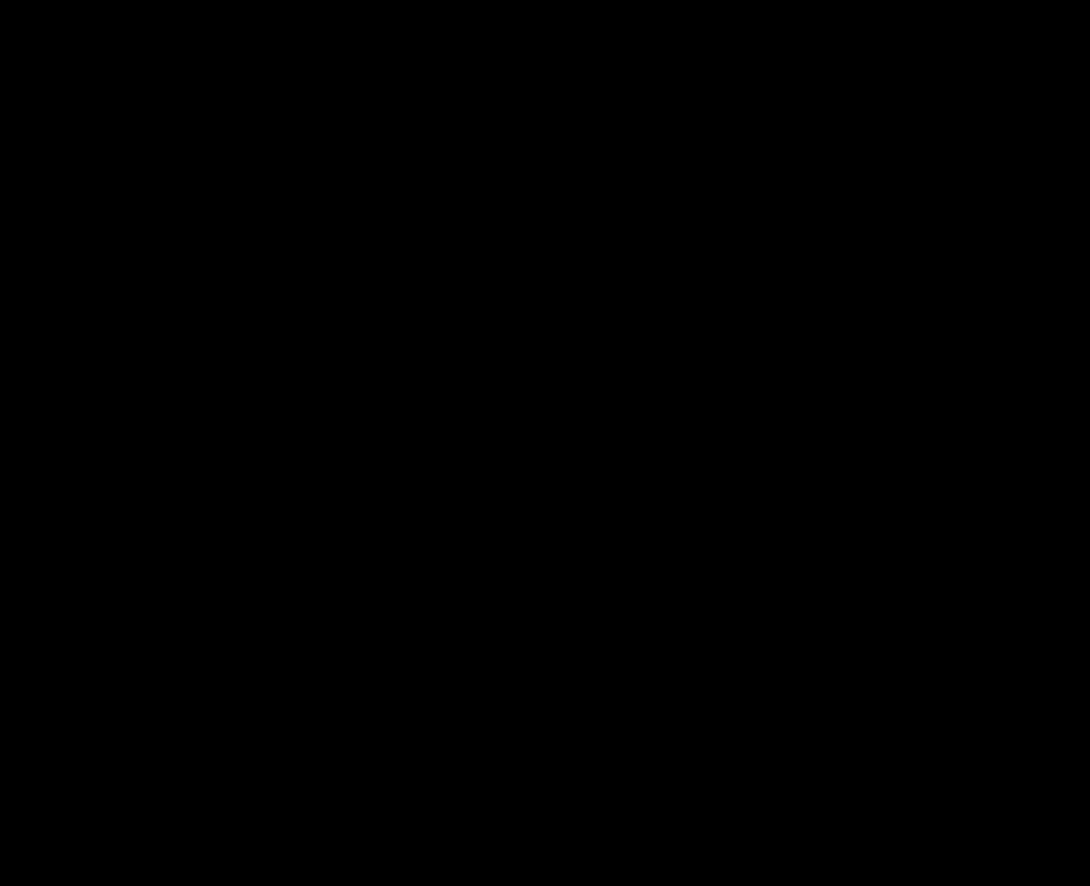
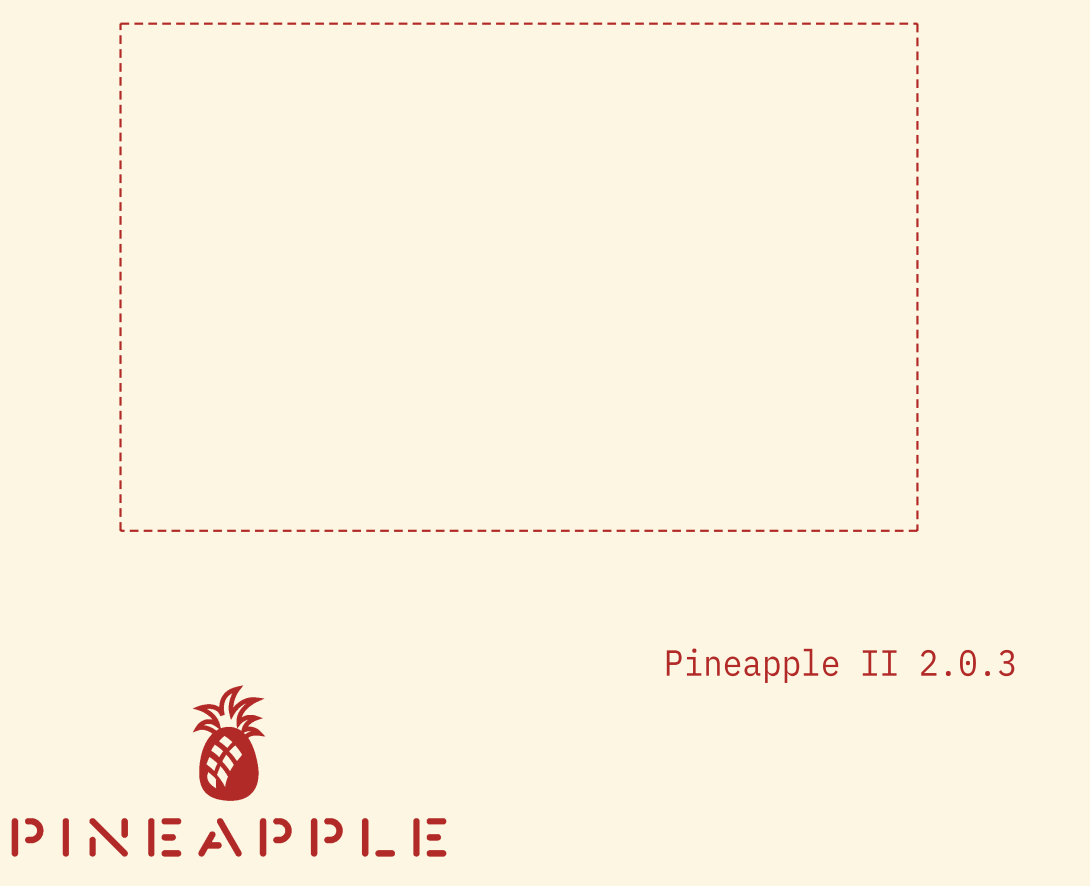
line: none -> (120, 23) (917, 23) (917, 530) (120, 530) (120, 23)
text: none -> Pineapple II 2.0.3 (840, 665)
part: none -> (229, 770)

